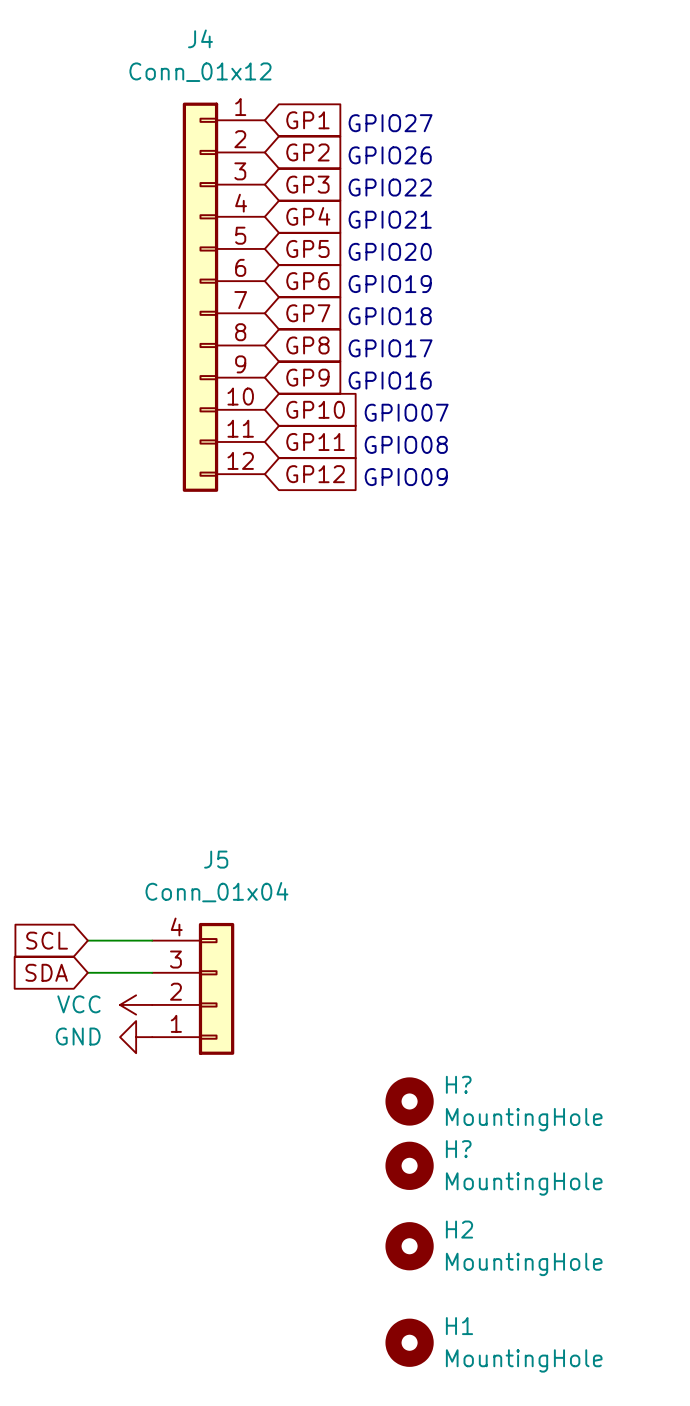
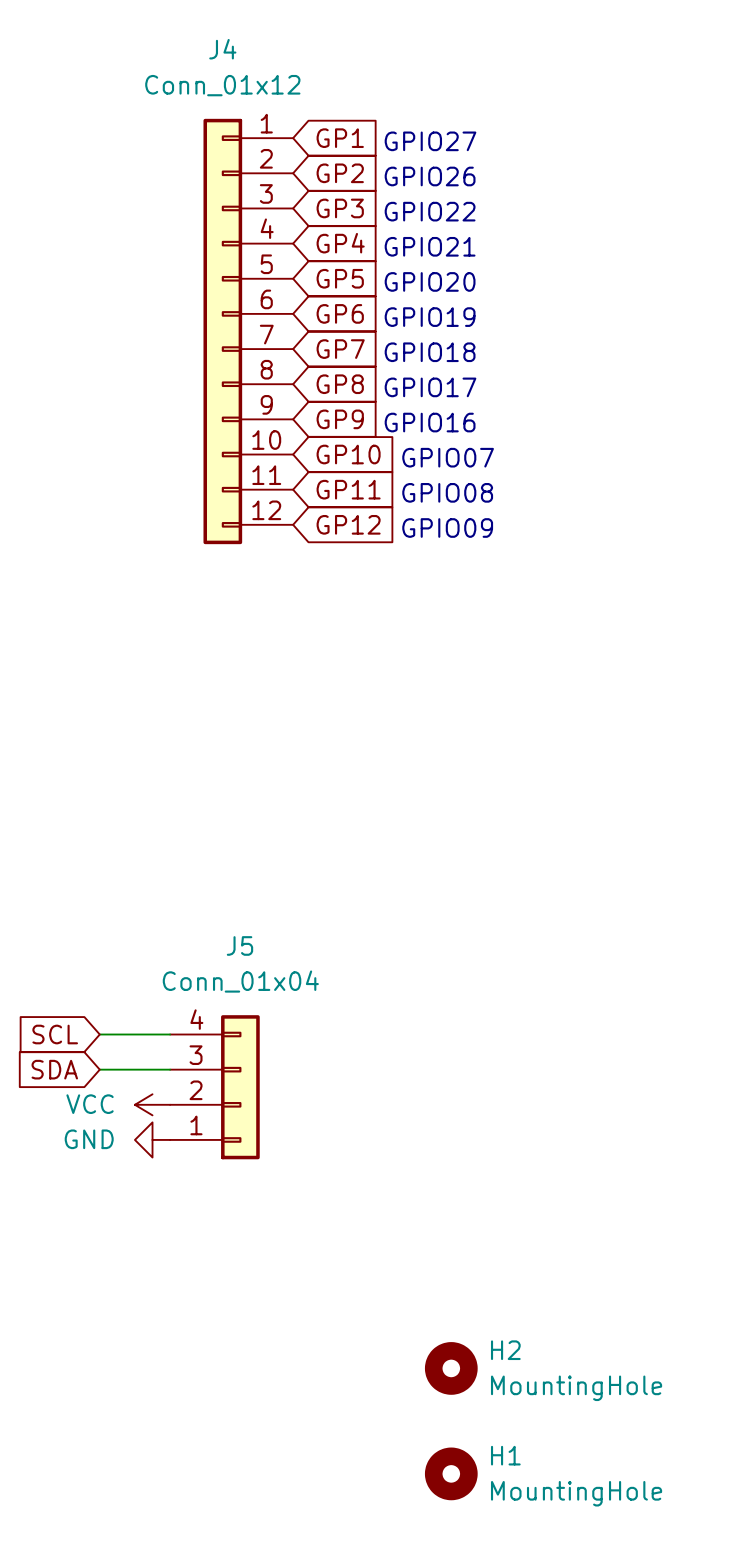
H?: MountingHole (409, 1101) -> none
H?: MountingHole (409, 1165) -> none

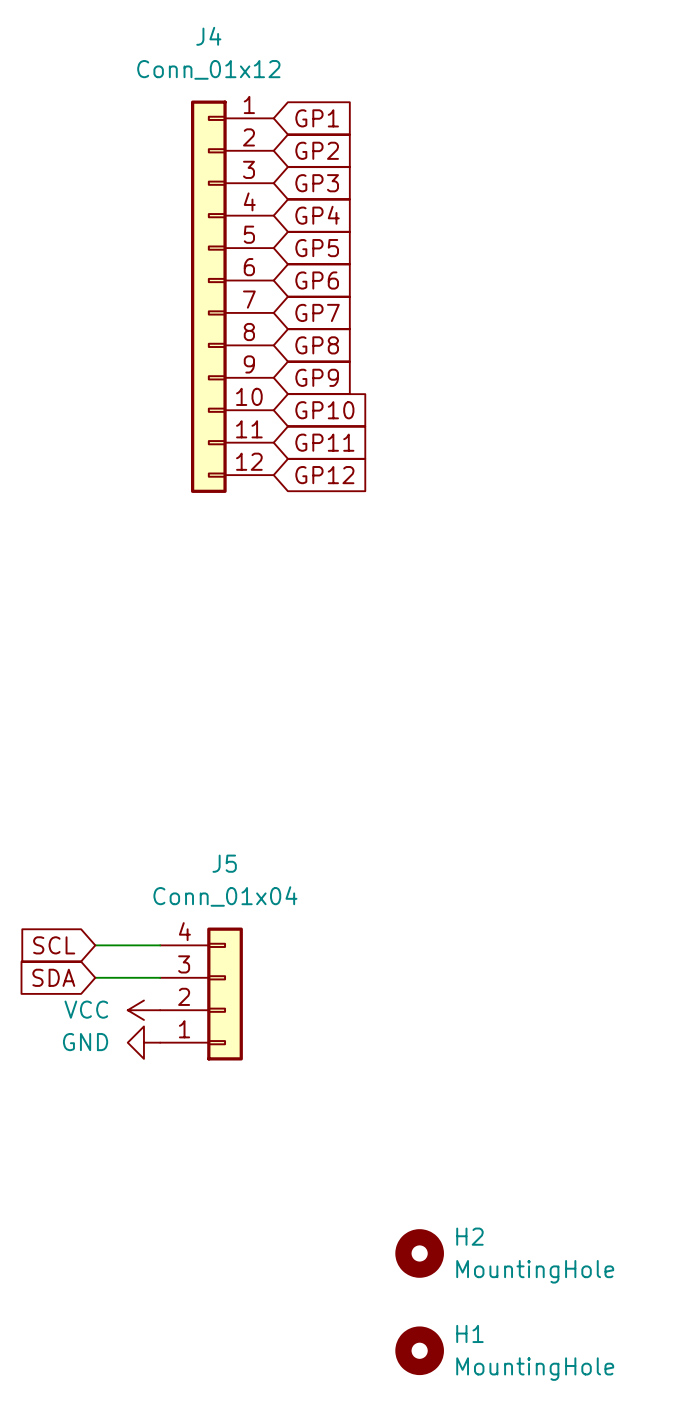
text: GPIO27 (430, 141) -> none
text: GPIO26 (430, 176) -> none
text: GPIO22 (430, 211) -> none
text: GPIO21 (430, 246) -> none
text: GPIO20 (430, 281) -> none
text: GPIO19 (430, 317) -> none
text: GPIO18 (430, 352) -> none
text: GPIO17 (430, 387) -> none
text: GPIO16 (430, 422) -> none
text: GPIO07 (448, 457) -> none
text: GPIO08 (447, 492) -> none
text: GPIO09 (447, 528) -> none

